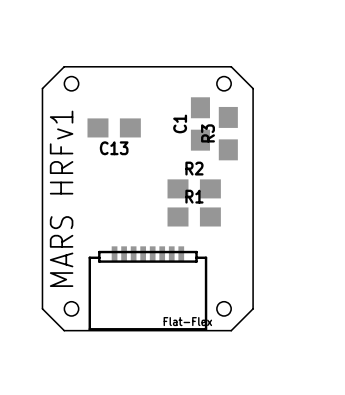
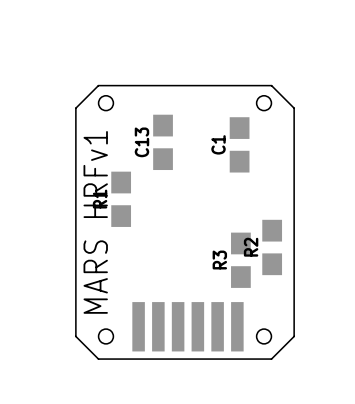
C13 rotation: 0° (114, 127) -> 90° clockwise (163, 142)
R3 position: (228, 133) -> (240, 260)
R2 rotation: 0° (194, 188) -> 90° clockwise (272, 247)
R2 position: (194, 188) -> (272, 247)
R1 rotation: 0° (194, 216) -> 90° clockwise (121, 199)
R1 position: (194, 216) -> (121, 199)
part footprint: [88, 246, 208, 331] -> [132, 302, 244, 352]

